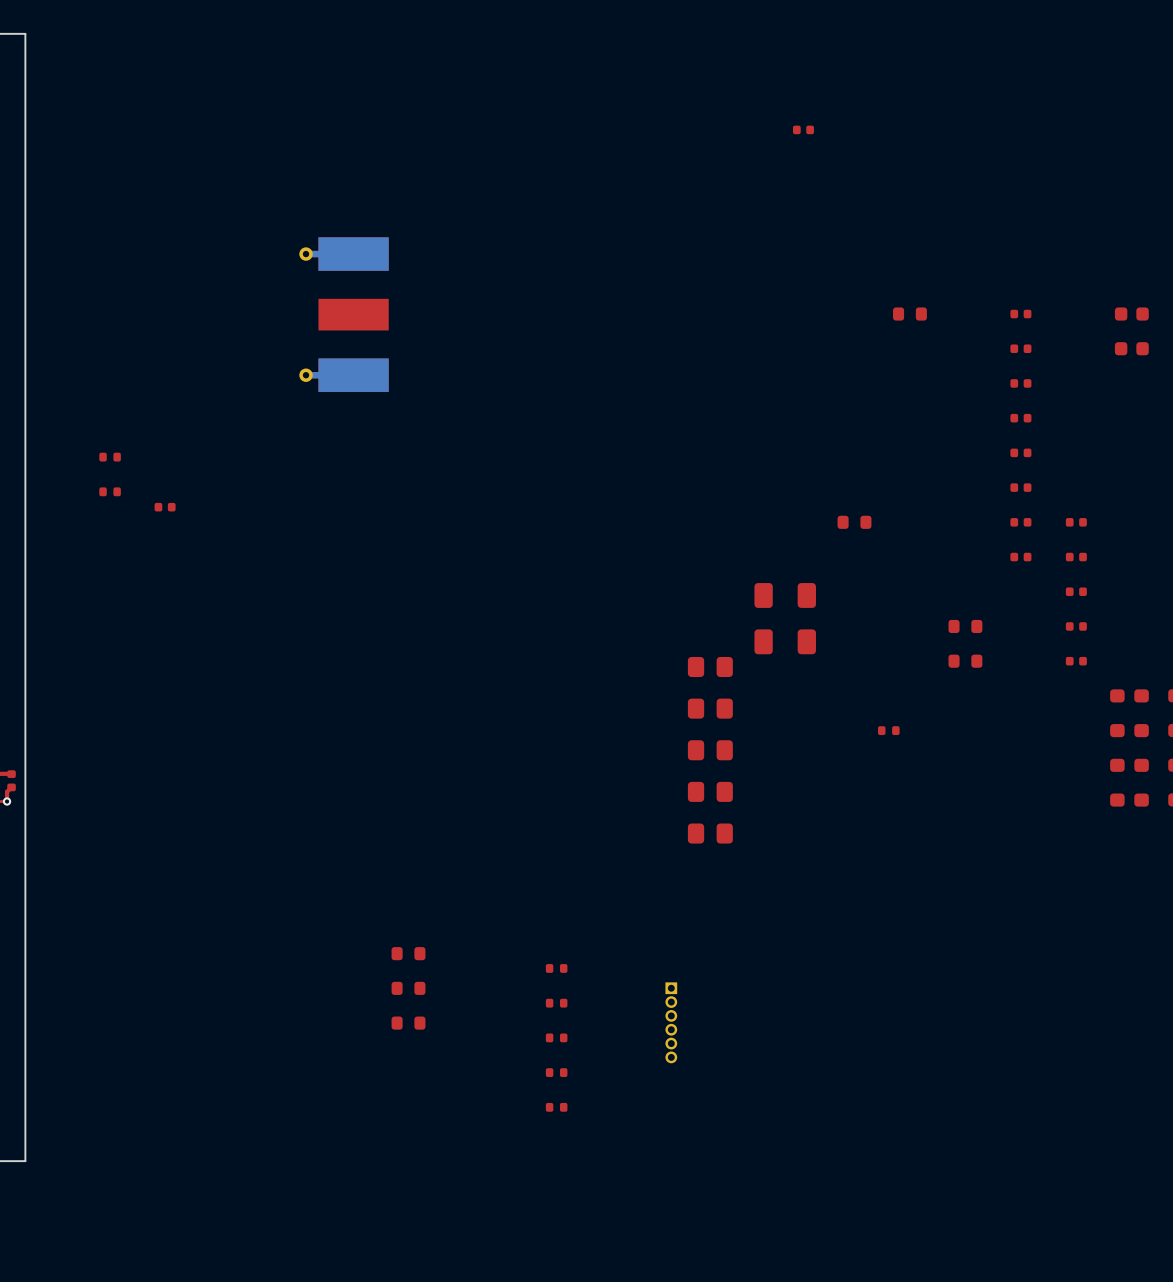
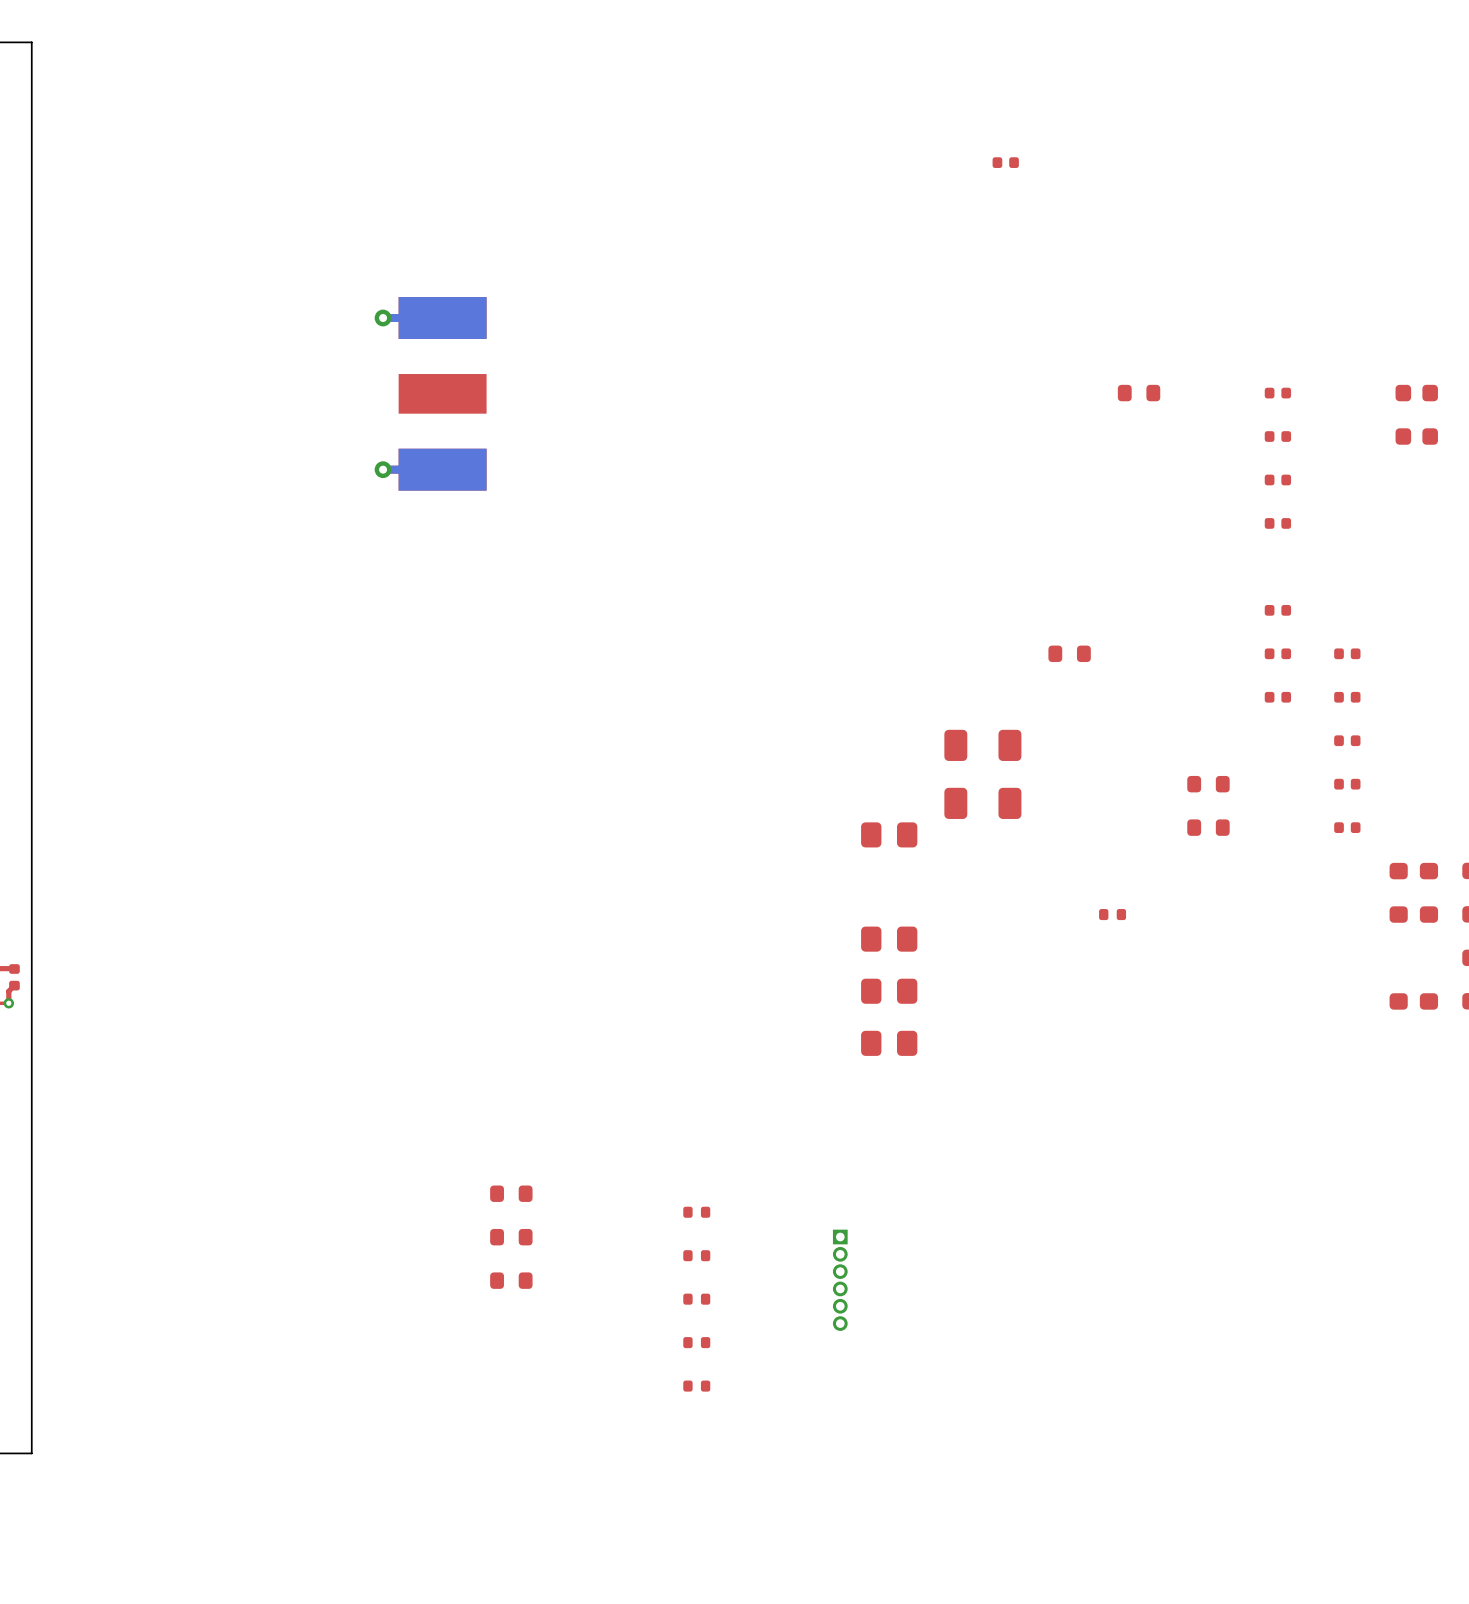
part: (1020, 452) -> none
part: (110, 457) -> none
part: (110, 491) -> none
part: (165, 507) -> none
part: (710, 708) -> none
part: (1129, 765) -> none

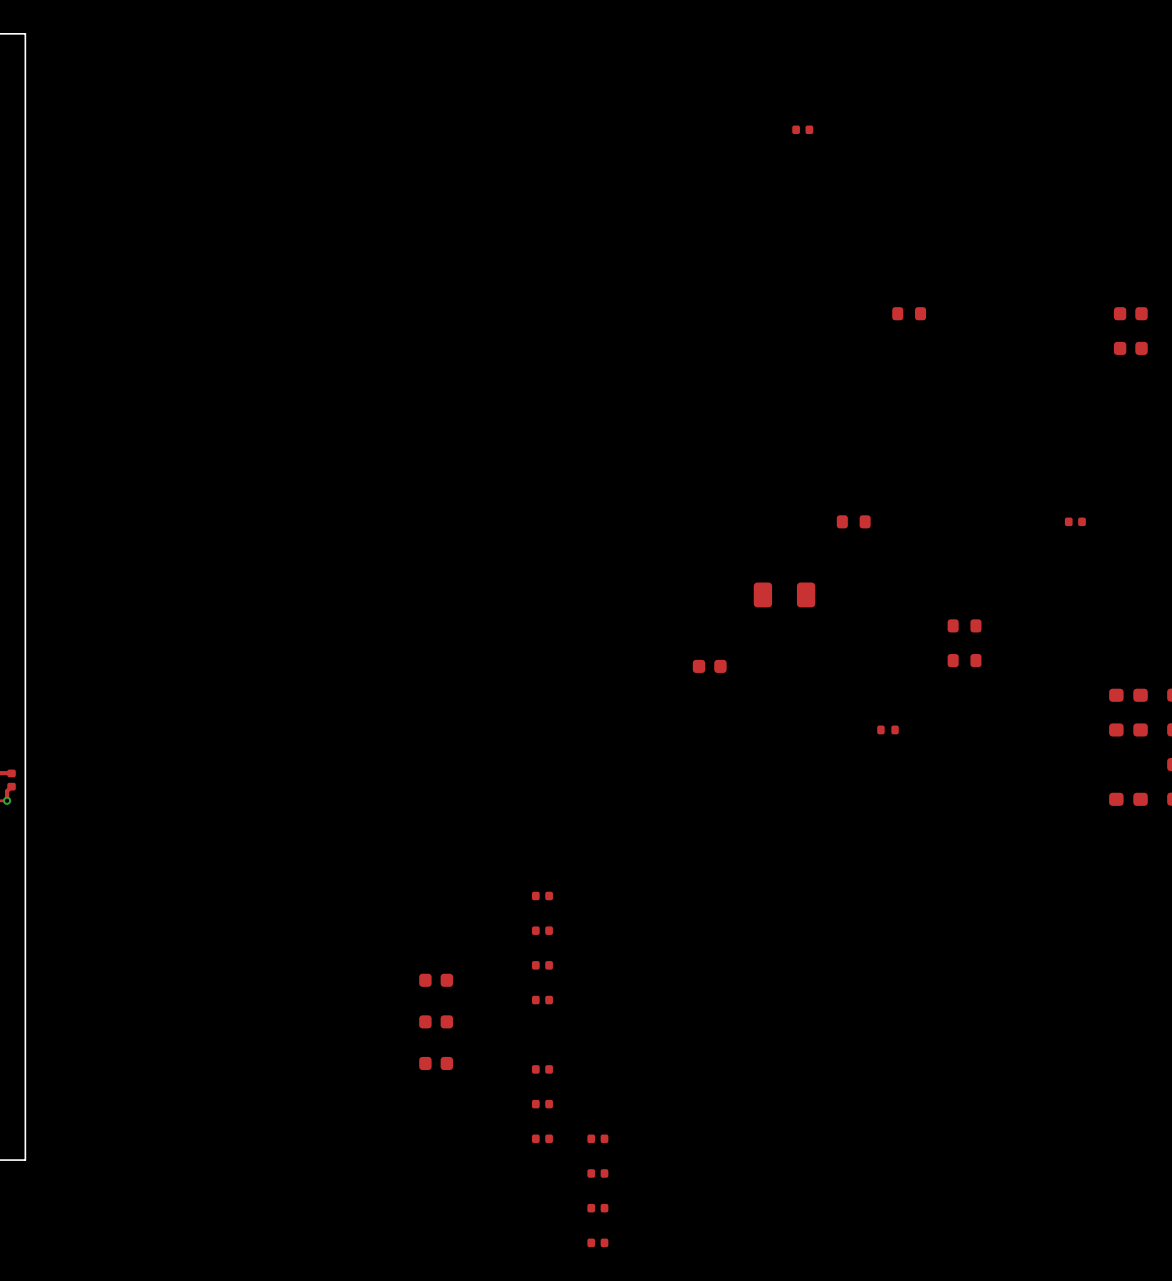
part: (430, 393) -> none
part: (1277, 393) -> none
part: (1277, 436) -> none
part: (1277, 479) -> none
part: (1277, 523) -> none
part: (1277, 610) -> none
part: (1277, 653) -> none
part: (1277, 697) -> none
part: (1347, 697) -> none
part: (1347, 740) -> none
part: (1347, 784) -> none
part: (982, 803) -> none
part footprint: [861, 822, 918, 848] -> [692, 659, 727, 673]
part: (1347, 827) -> none
part: (889, 939) -> none
part: (889, 991) -> none
part: (889, 1043) -> none
part: none -> (542, 895)
part: none -> (542, 930)
part: (511, 1193) -> none
part: none -> (542, 965)
part: (696, 1212) -> none
part: none -> (436, 980)
part: (511, 1237) -> none
part: none -> (542, 1000)
part: (696, 1255) -> none
part: (511, 1280) -> none
part: none -> (436, 1021)
part: (840, 1280) -> none
part: (696, 1299) -> none
part: none -> (436, 1063)
part: none -> (542, 1069)
part: (696, 1342) -> none
part: none -> (542, 1104)
part: (696, 1386) -> none
part: none -> (542, 1138)
part: none -> (597, 1138)
part: none -> (597, 1173)
part: none -> (597, 1208)
part: none -> (597, 1242)

